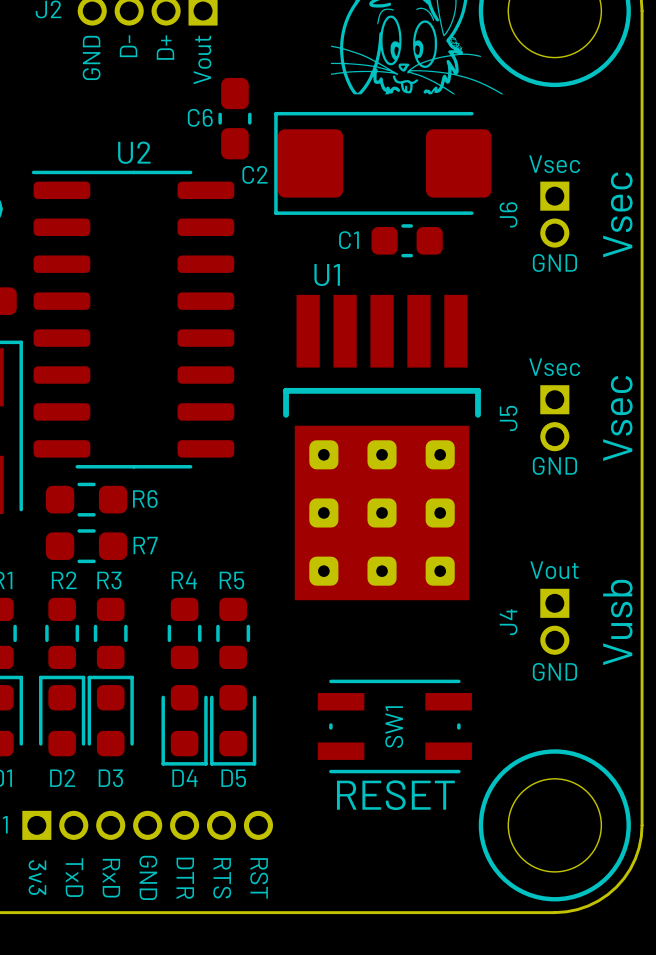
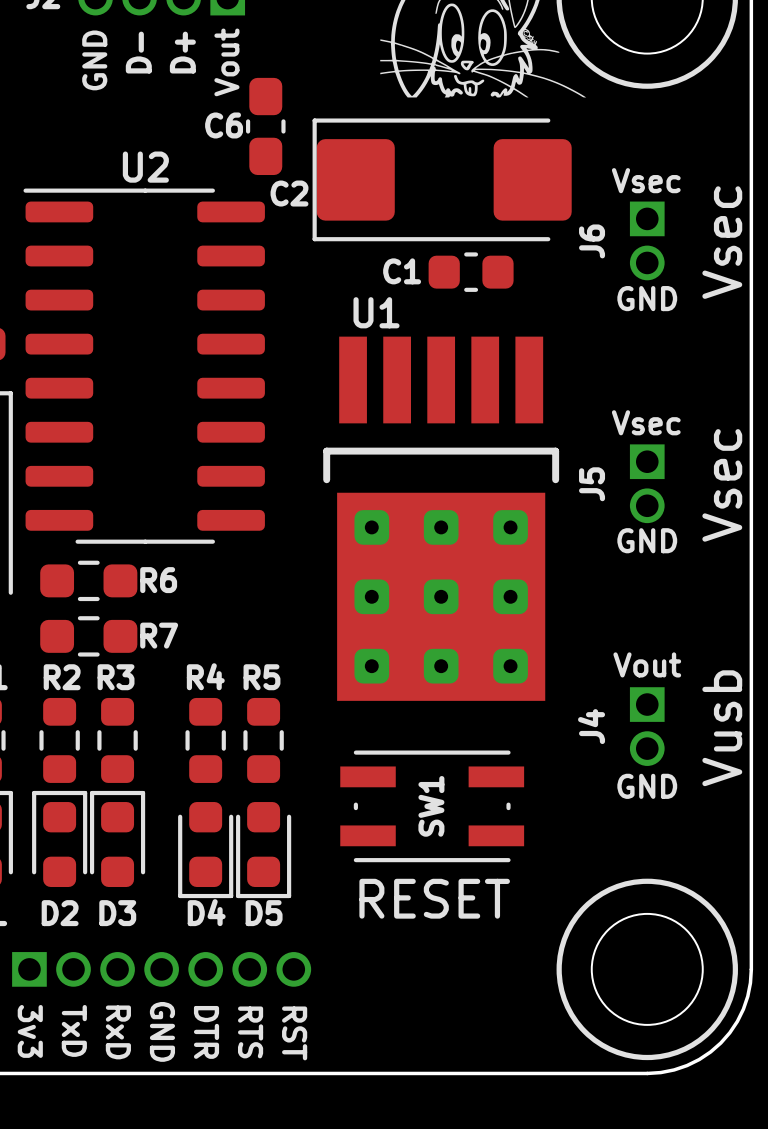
SW1 position: (394, 726) -> (432, 806)
text position: RESET (395, 795) -> RESET (434, 898)

